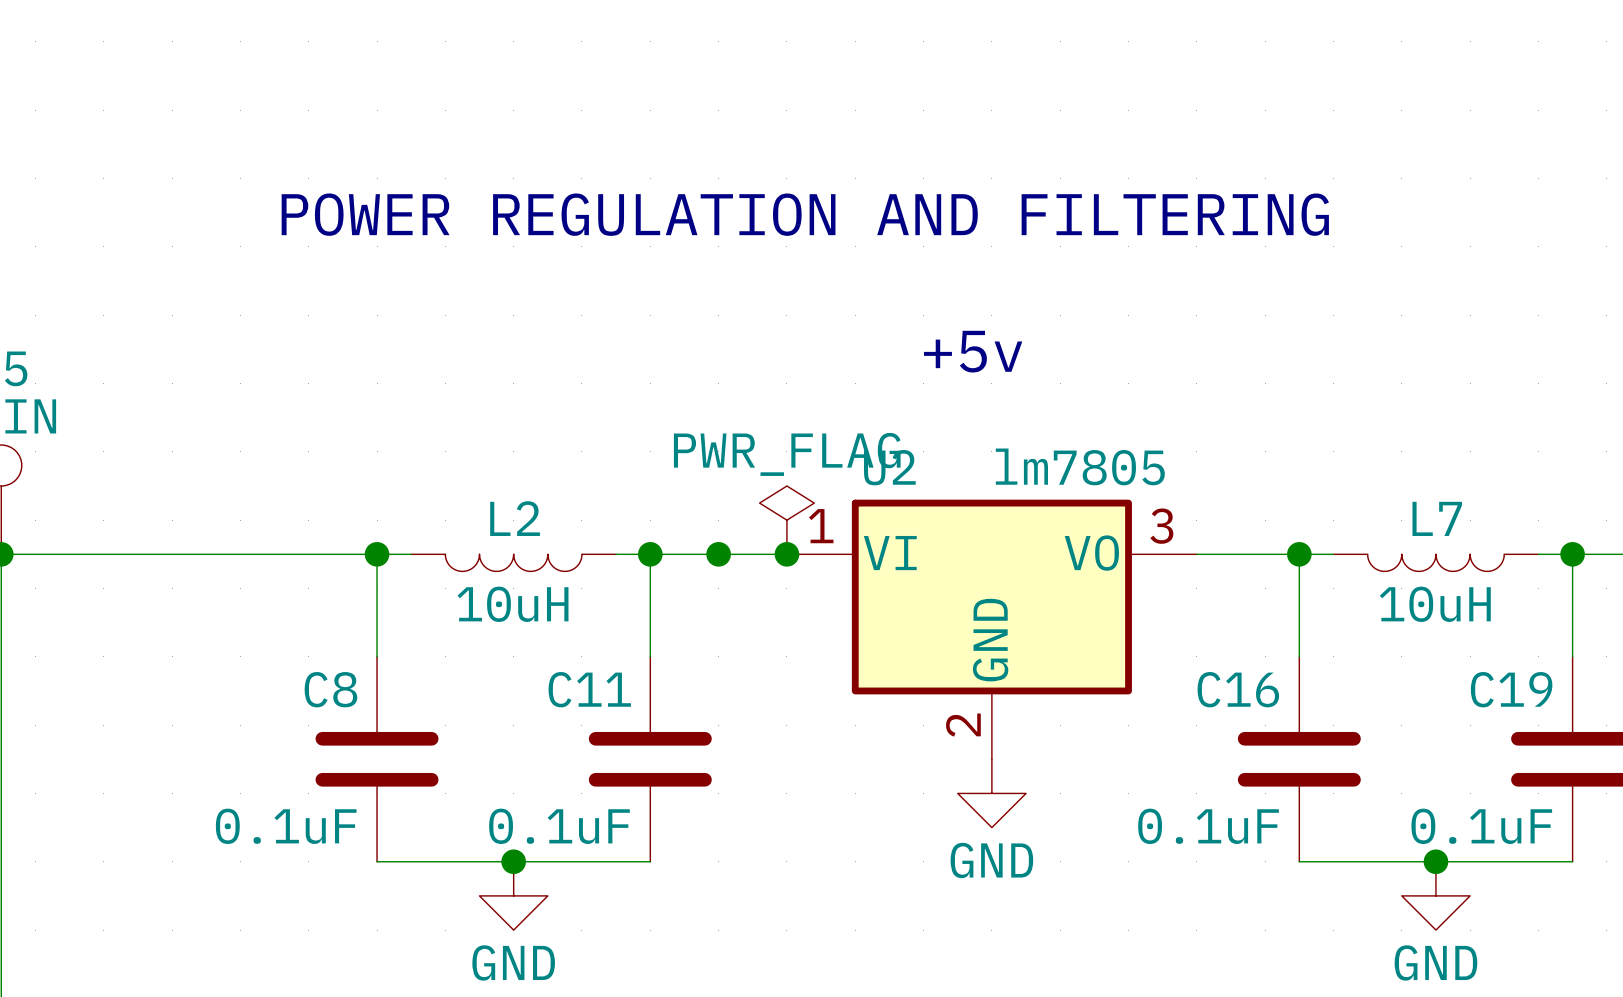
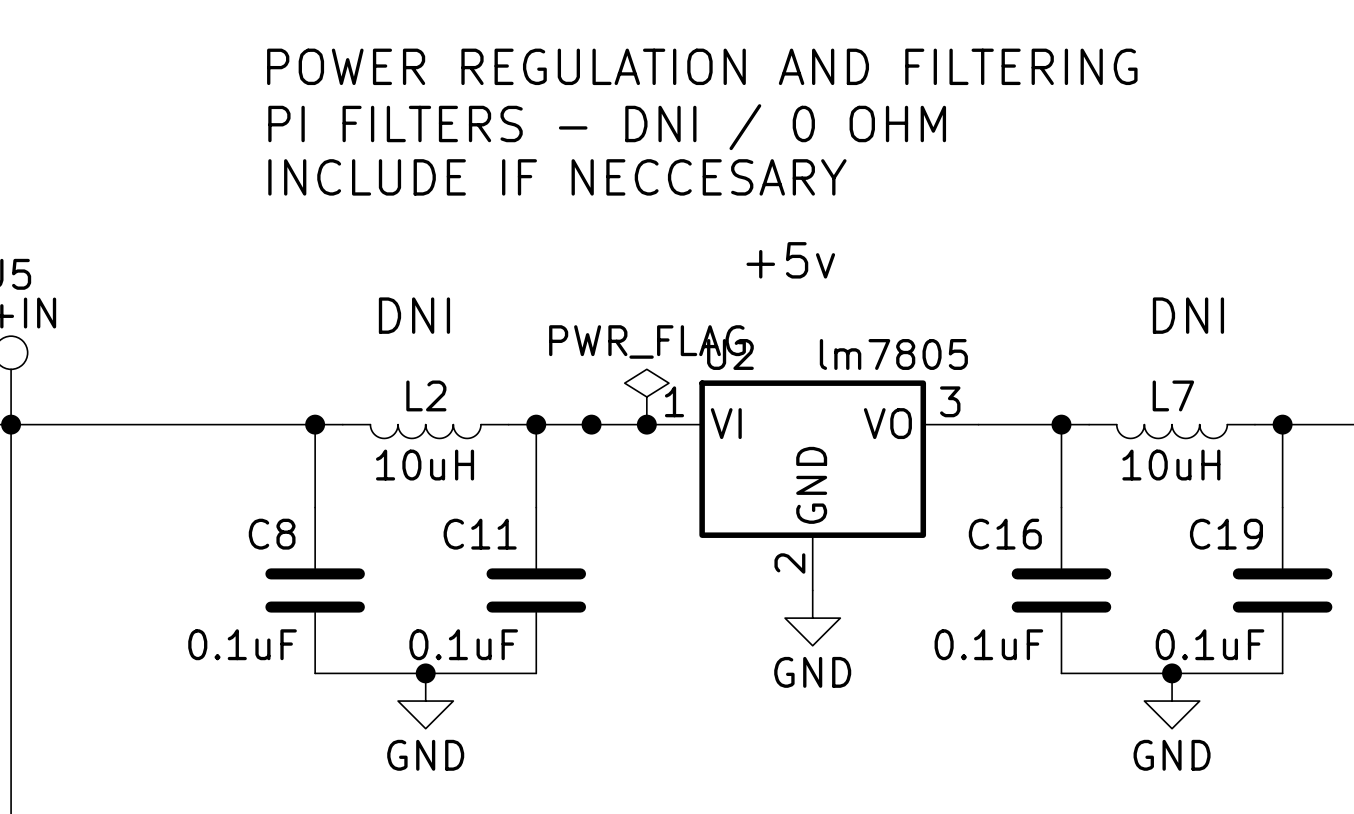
text: none -> PI FILTERS - DNI / 0 OHM (607, 127)
text position: POWER REGULATION AND FILTERING (805, 214) -> POWER REGULATION AND FILTERING (702, 66)
text: none -> INCLUDE IF NECCESARY (557, 177)
text: none -> DNI (414, 315)
text: none -> DNI (1188, 315)

